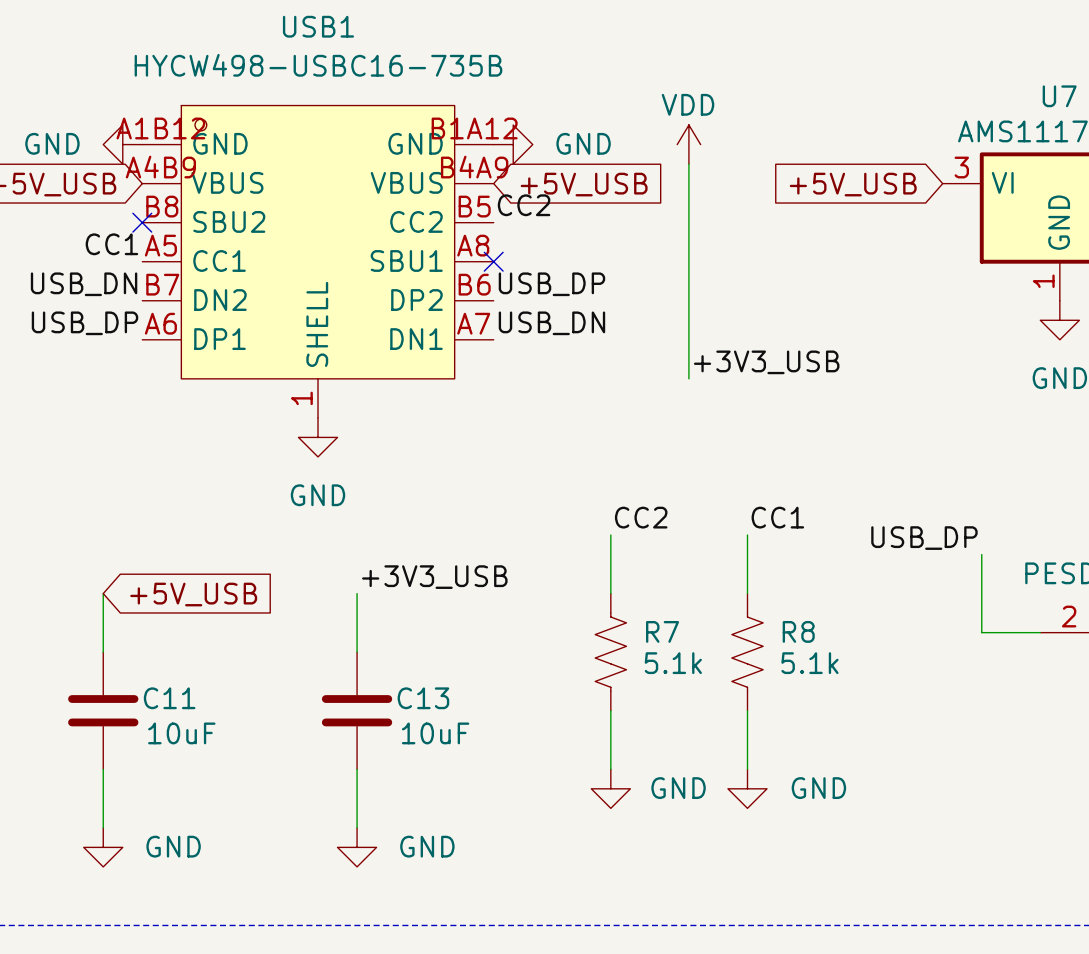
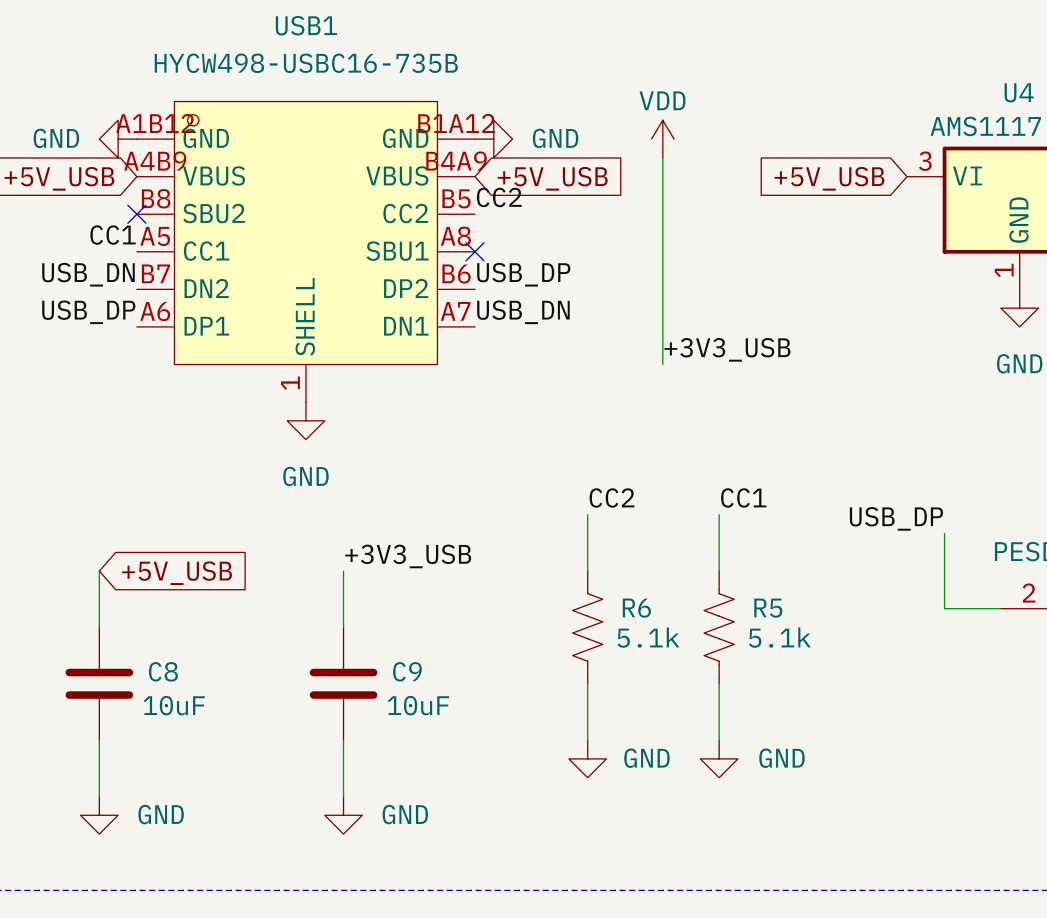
U7 name: U7 (1059, 96) -> U4 (1019, 92)
R7 name: R7 (662, 631) -> R6 (636, 608)
R8 name: R8 (798, 631) -> R5 (768, 608)
C11 name: C11 (169, 698) -> C8 (163, 671)
C13 name: C13 (423, 698) -> C9 (407, 671)

